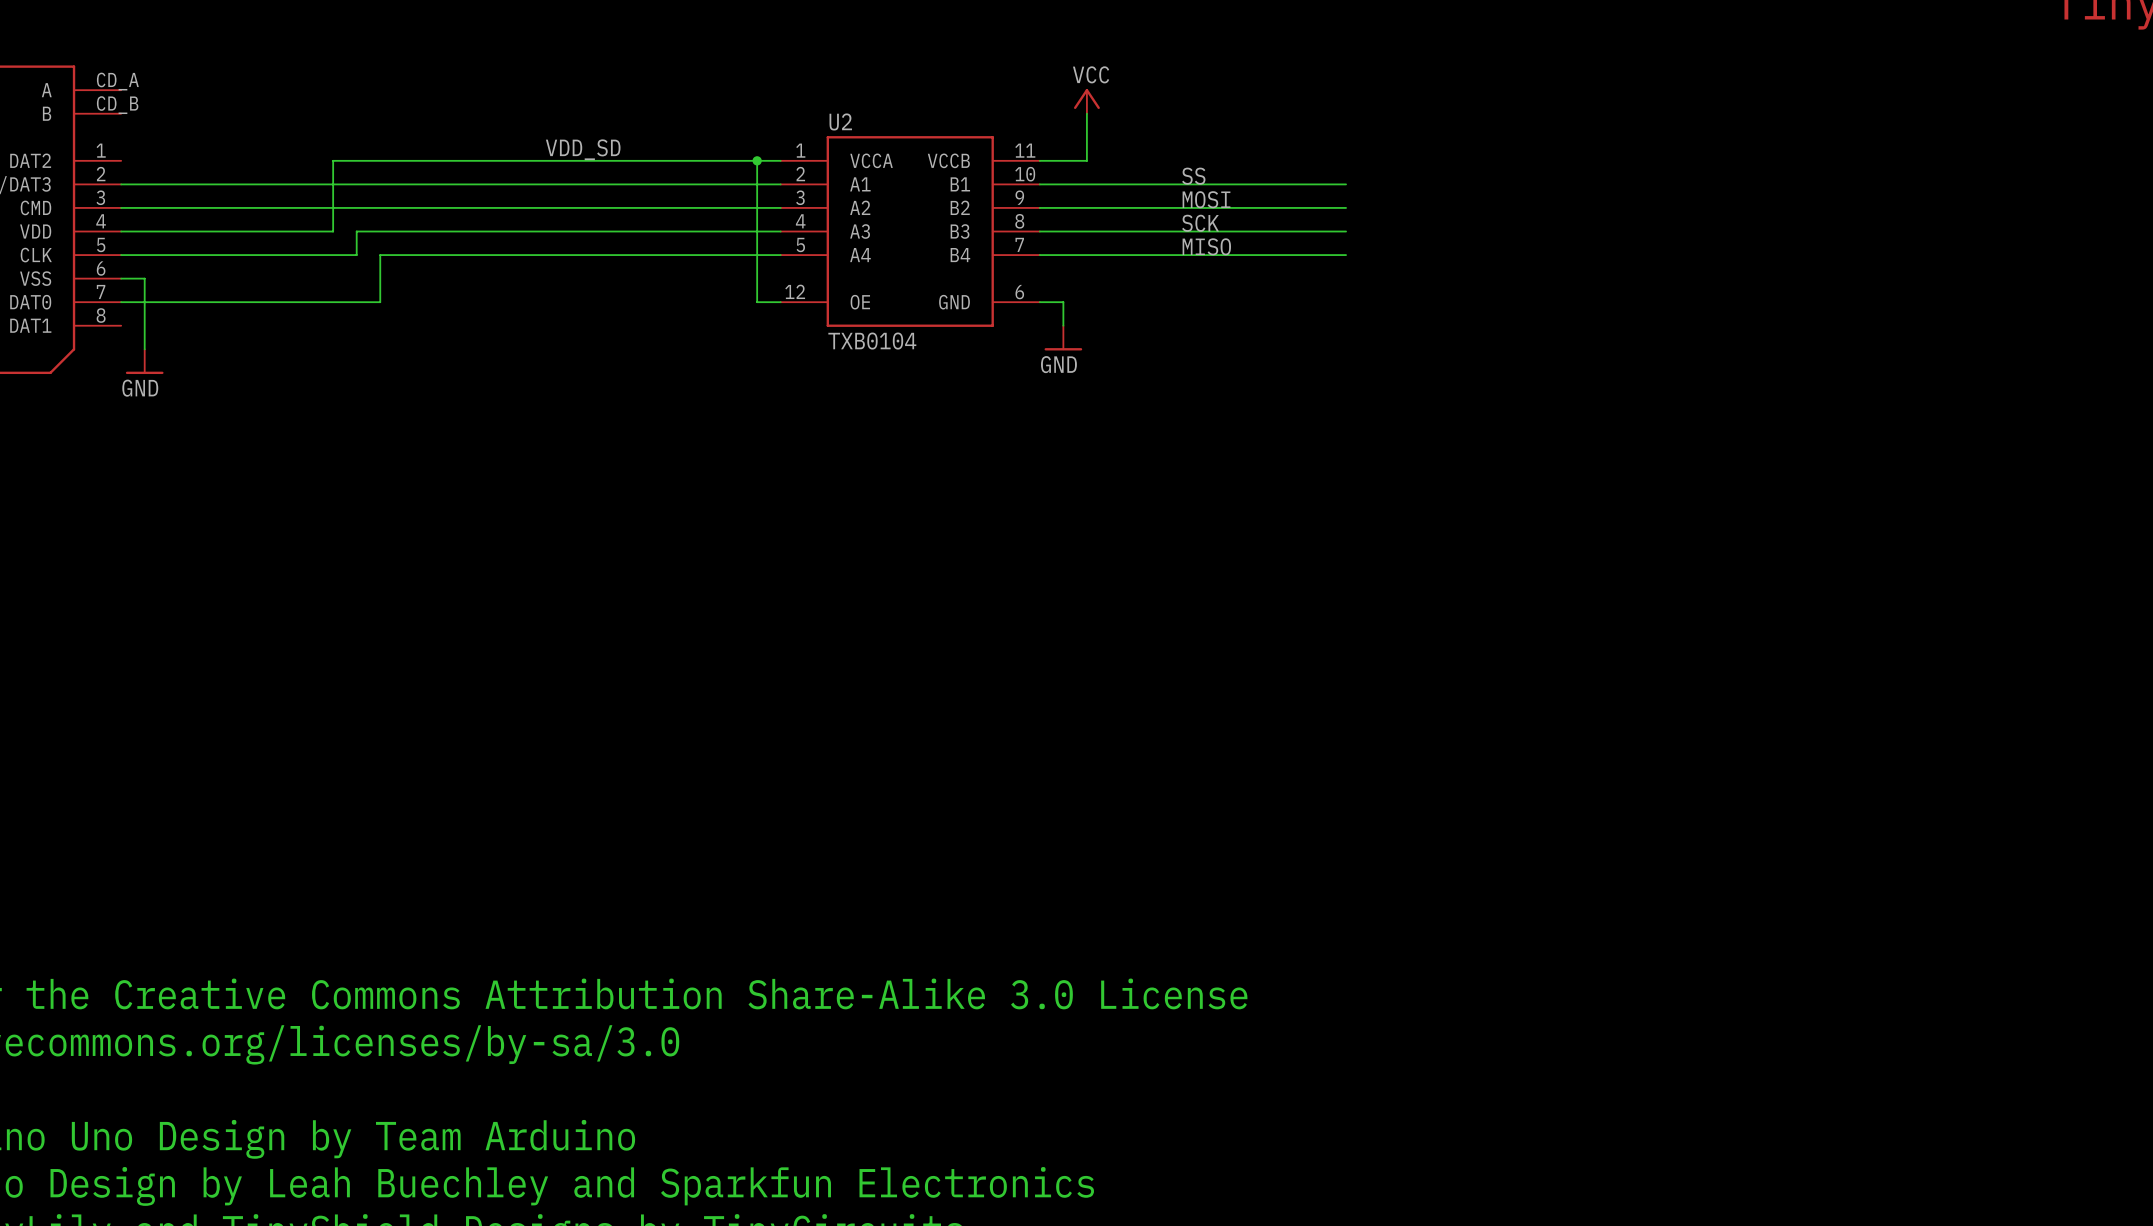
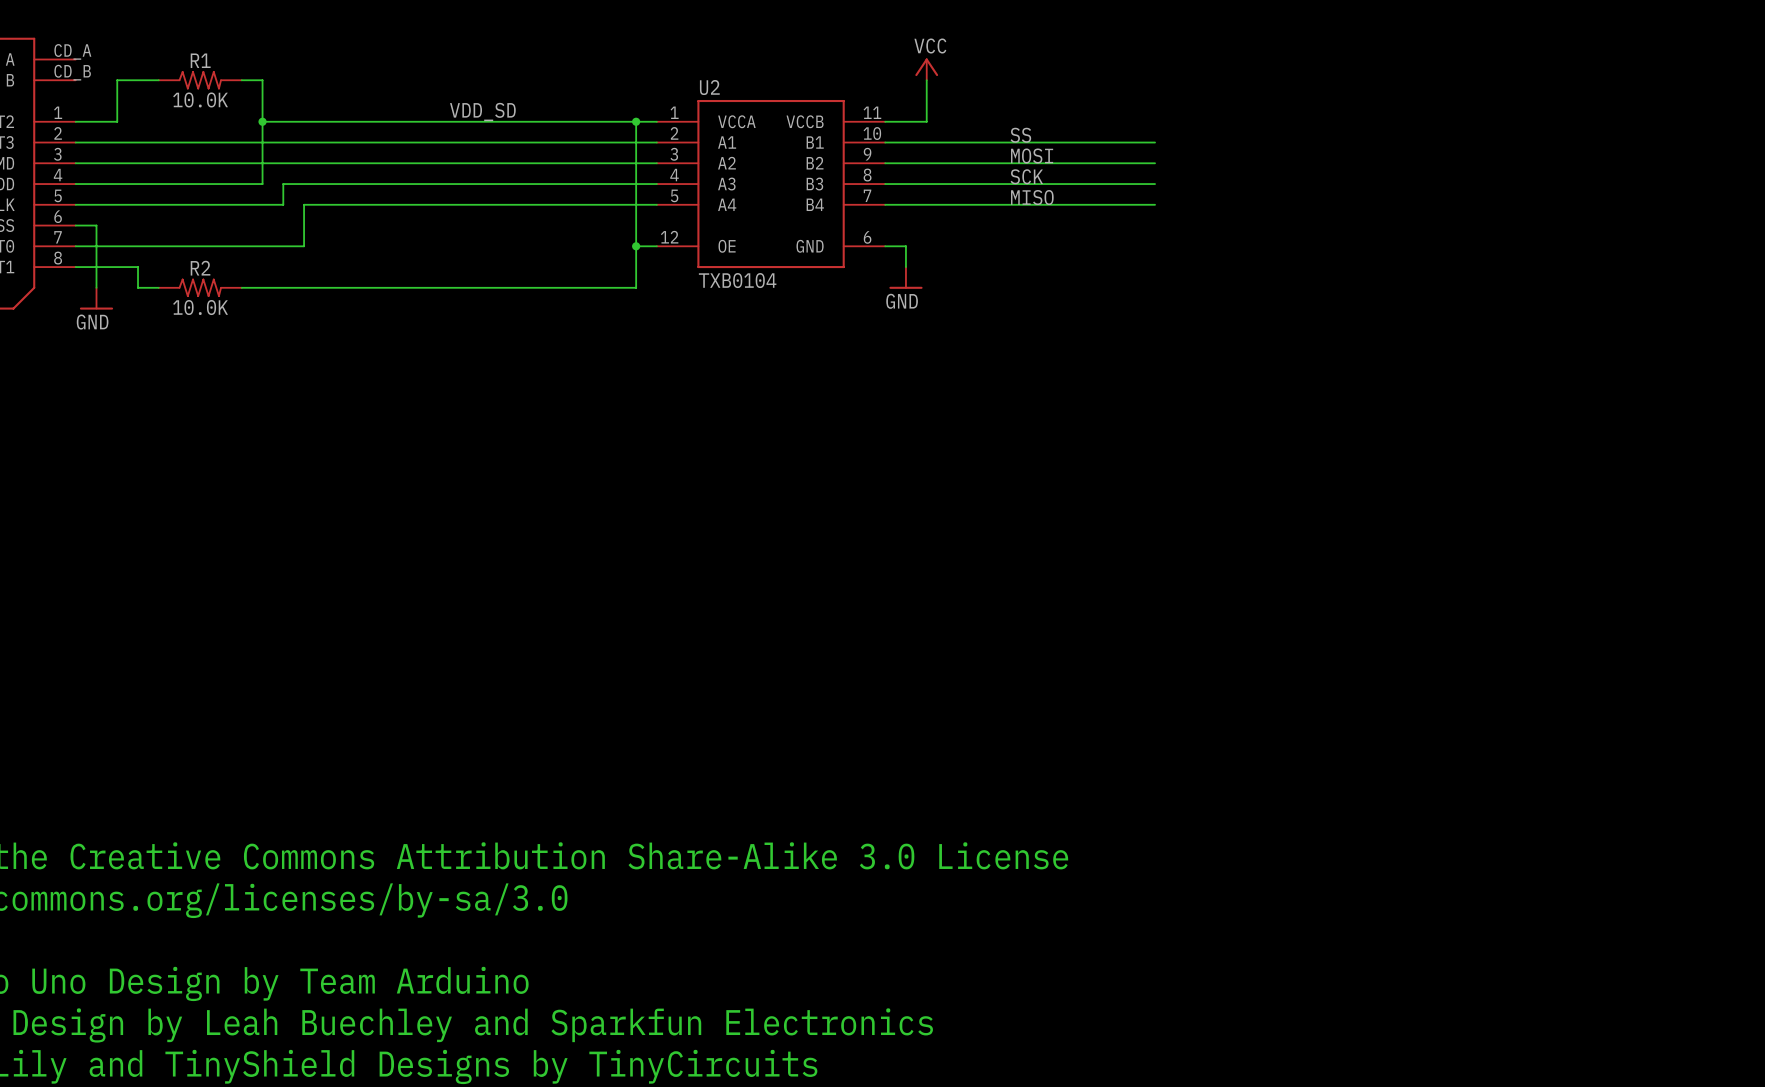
wire: none -> (158, 80) (117, 80) (117, 121) (75, 121)
R1: none -> 10.0K (200, 80)
wire: none -> (241, 80) (262, 80) (262, 121)
junction: none -> (262, 121)
wire: none -> (636, 246) (636, 287) (241, 287)
junction: none -> (636, 246)
wire: none -> (75, 267) (138, 267) (138, 287) (158, 287)
R2: none -> 10.0K (200, 287)

